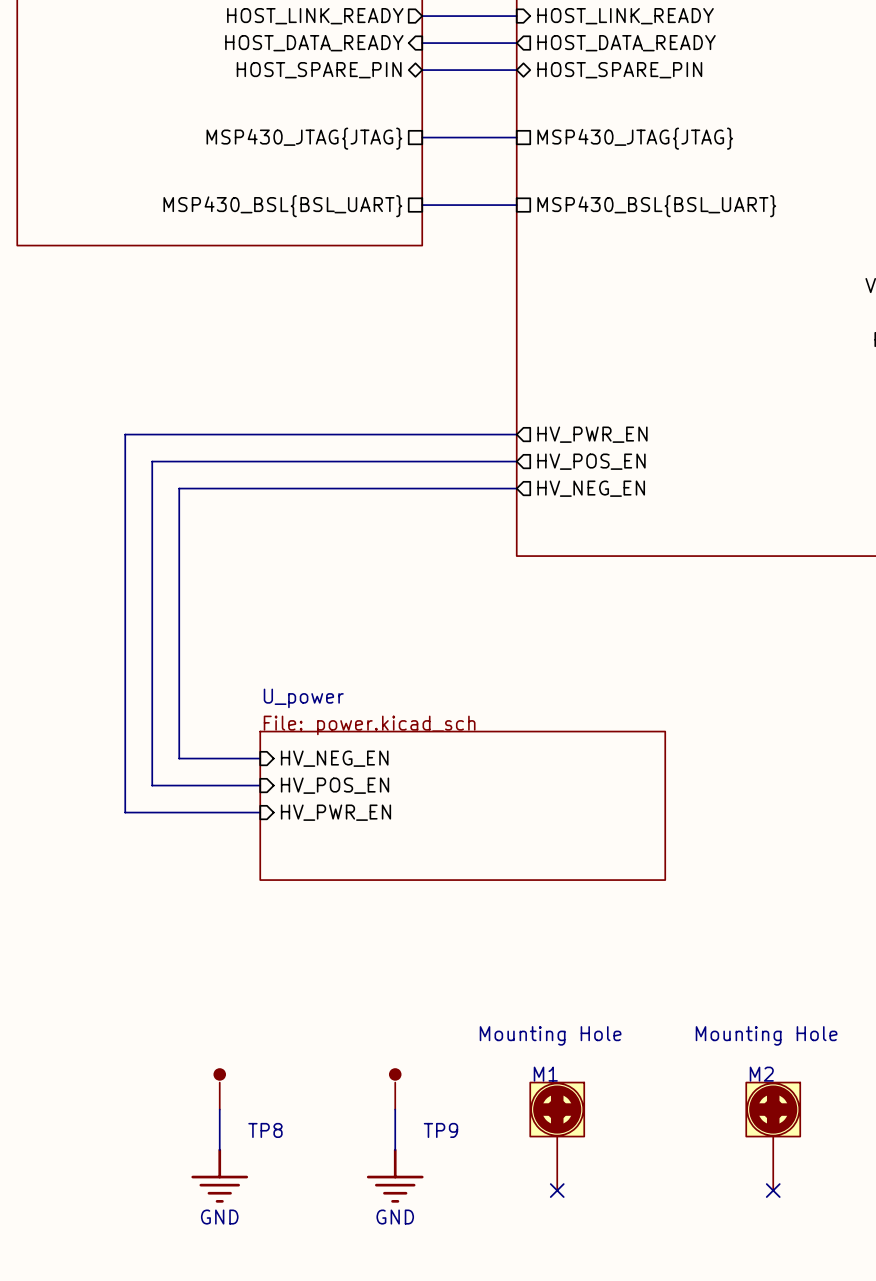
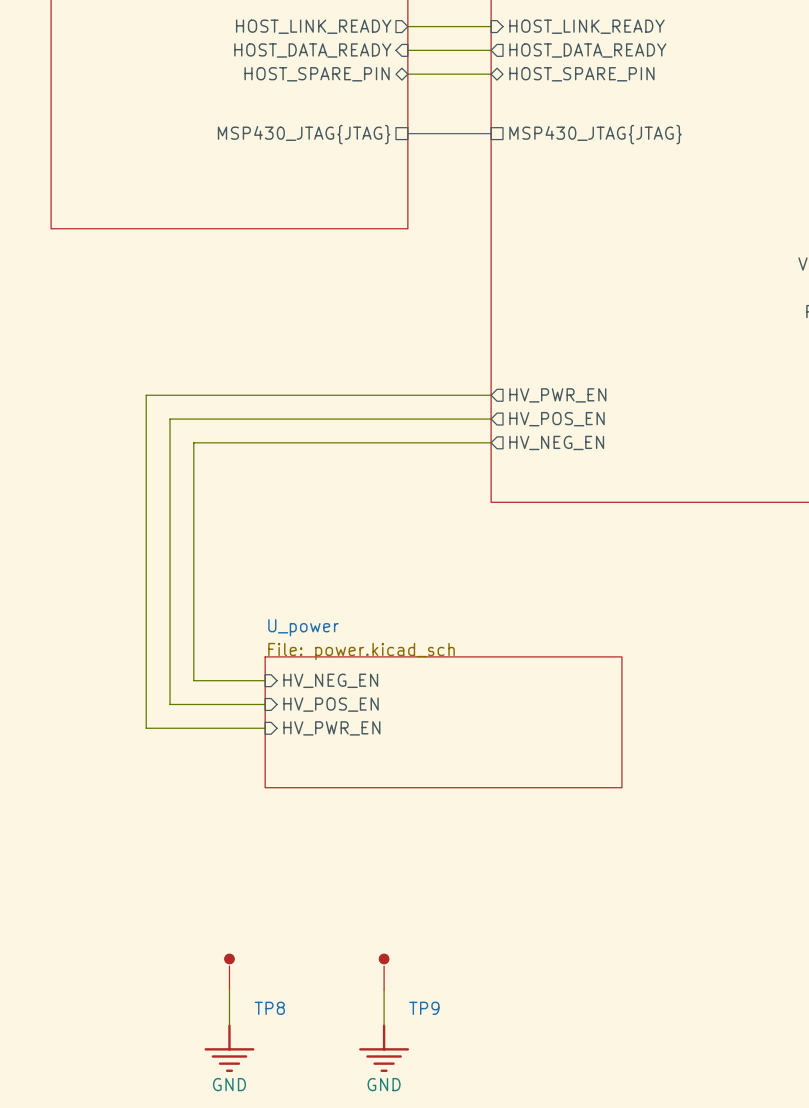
bus: (422, 205) (516, 205) -> none
sheet pin: MSP430_BSL{BSL_UART} (282, 206) -> none
sheet pin: MSP430_BSL{BSL_UART} (656, 206) -> none
M1: Mounting Hole (557, 1136) -> none
M2: Mounting Hole (773, 1136) -> none
no-connect mark: (557, 1190) -> none
no-connect mark: (773, 1190) -> none

